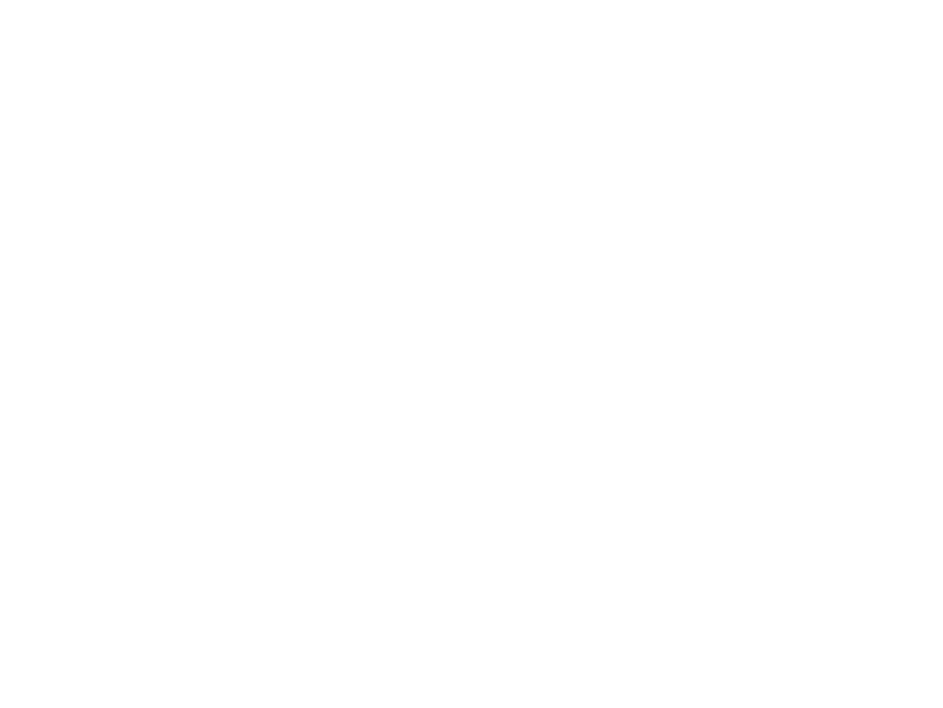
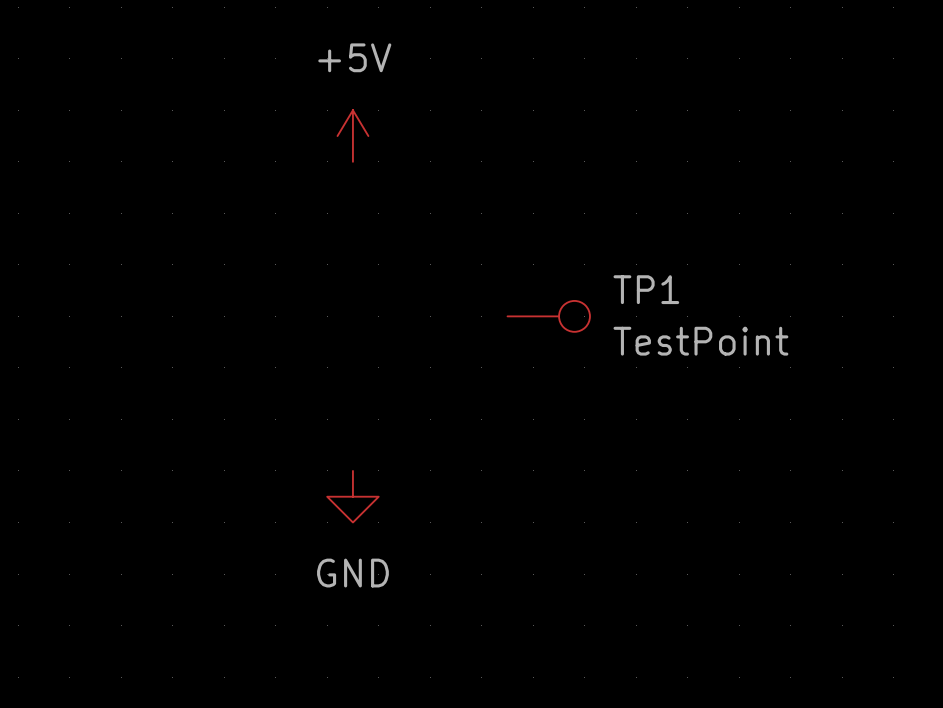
power symbol: none -> +5V (352, 136)
TP1: none -> TestPoint (548, 316)
power symbol: none -> GND (352, 496)

